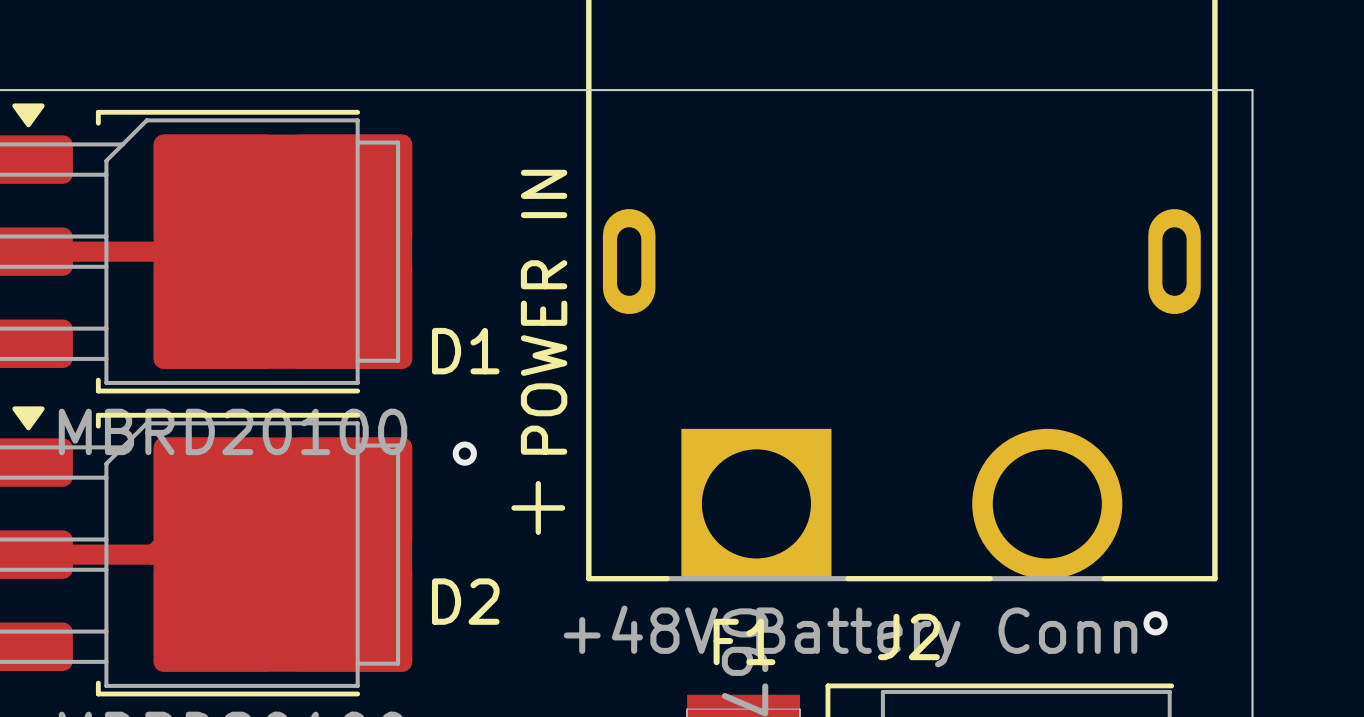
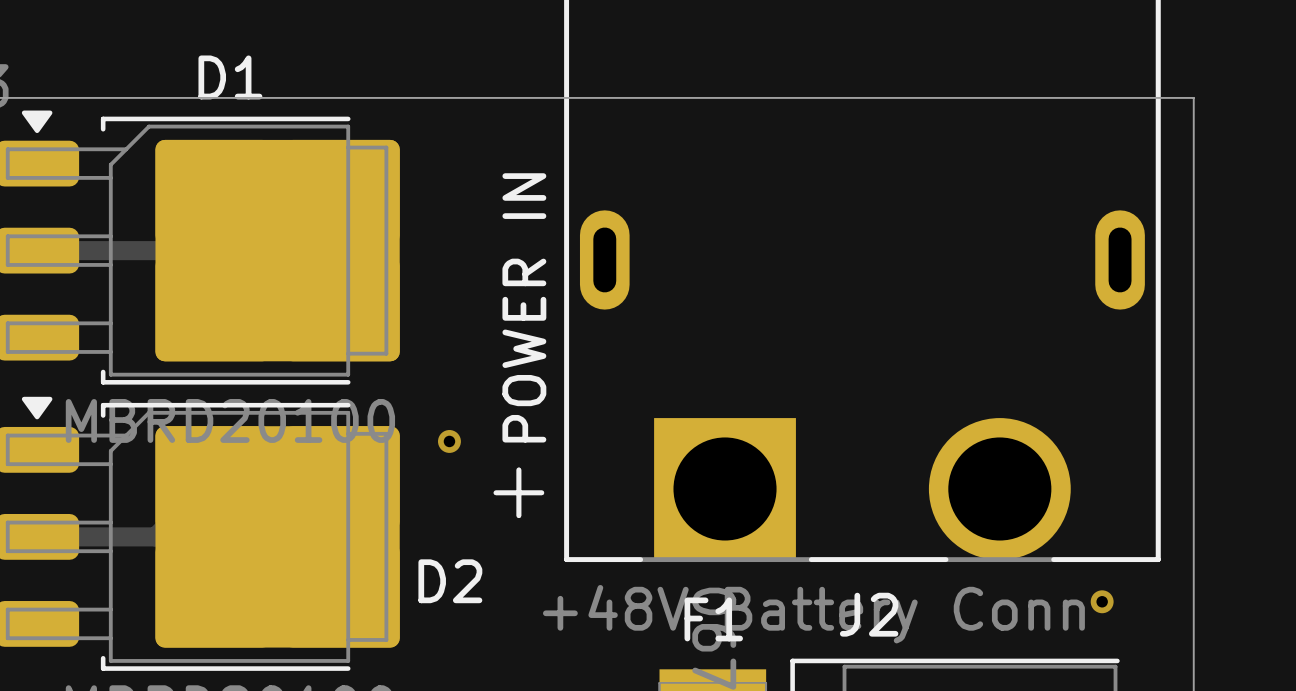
D1 name position: D1 (465, 351) -> D1 (230, 77)

